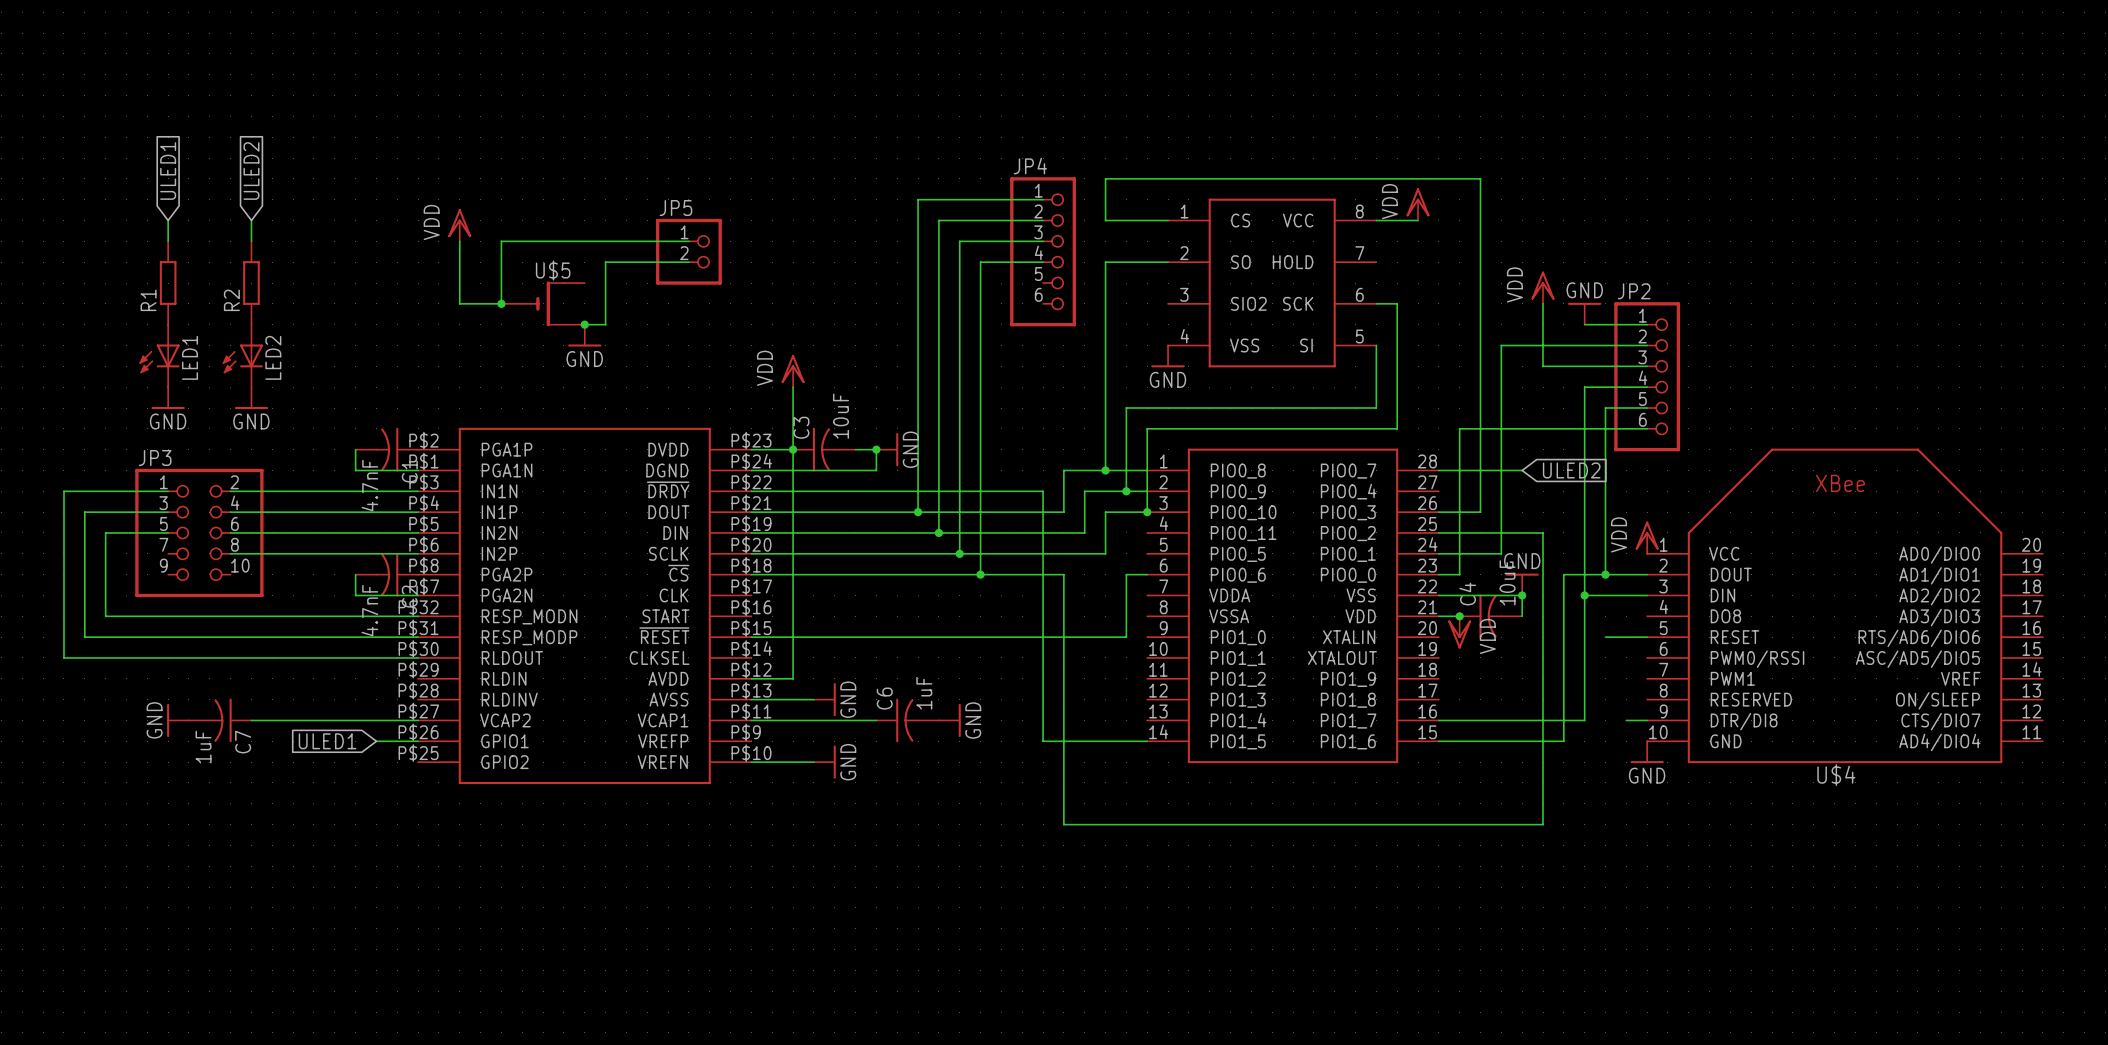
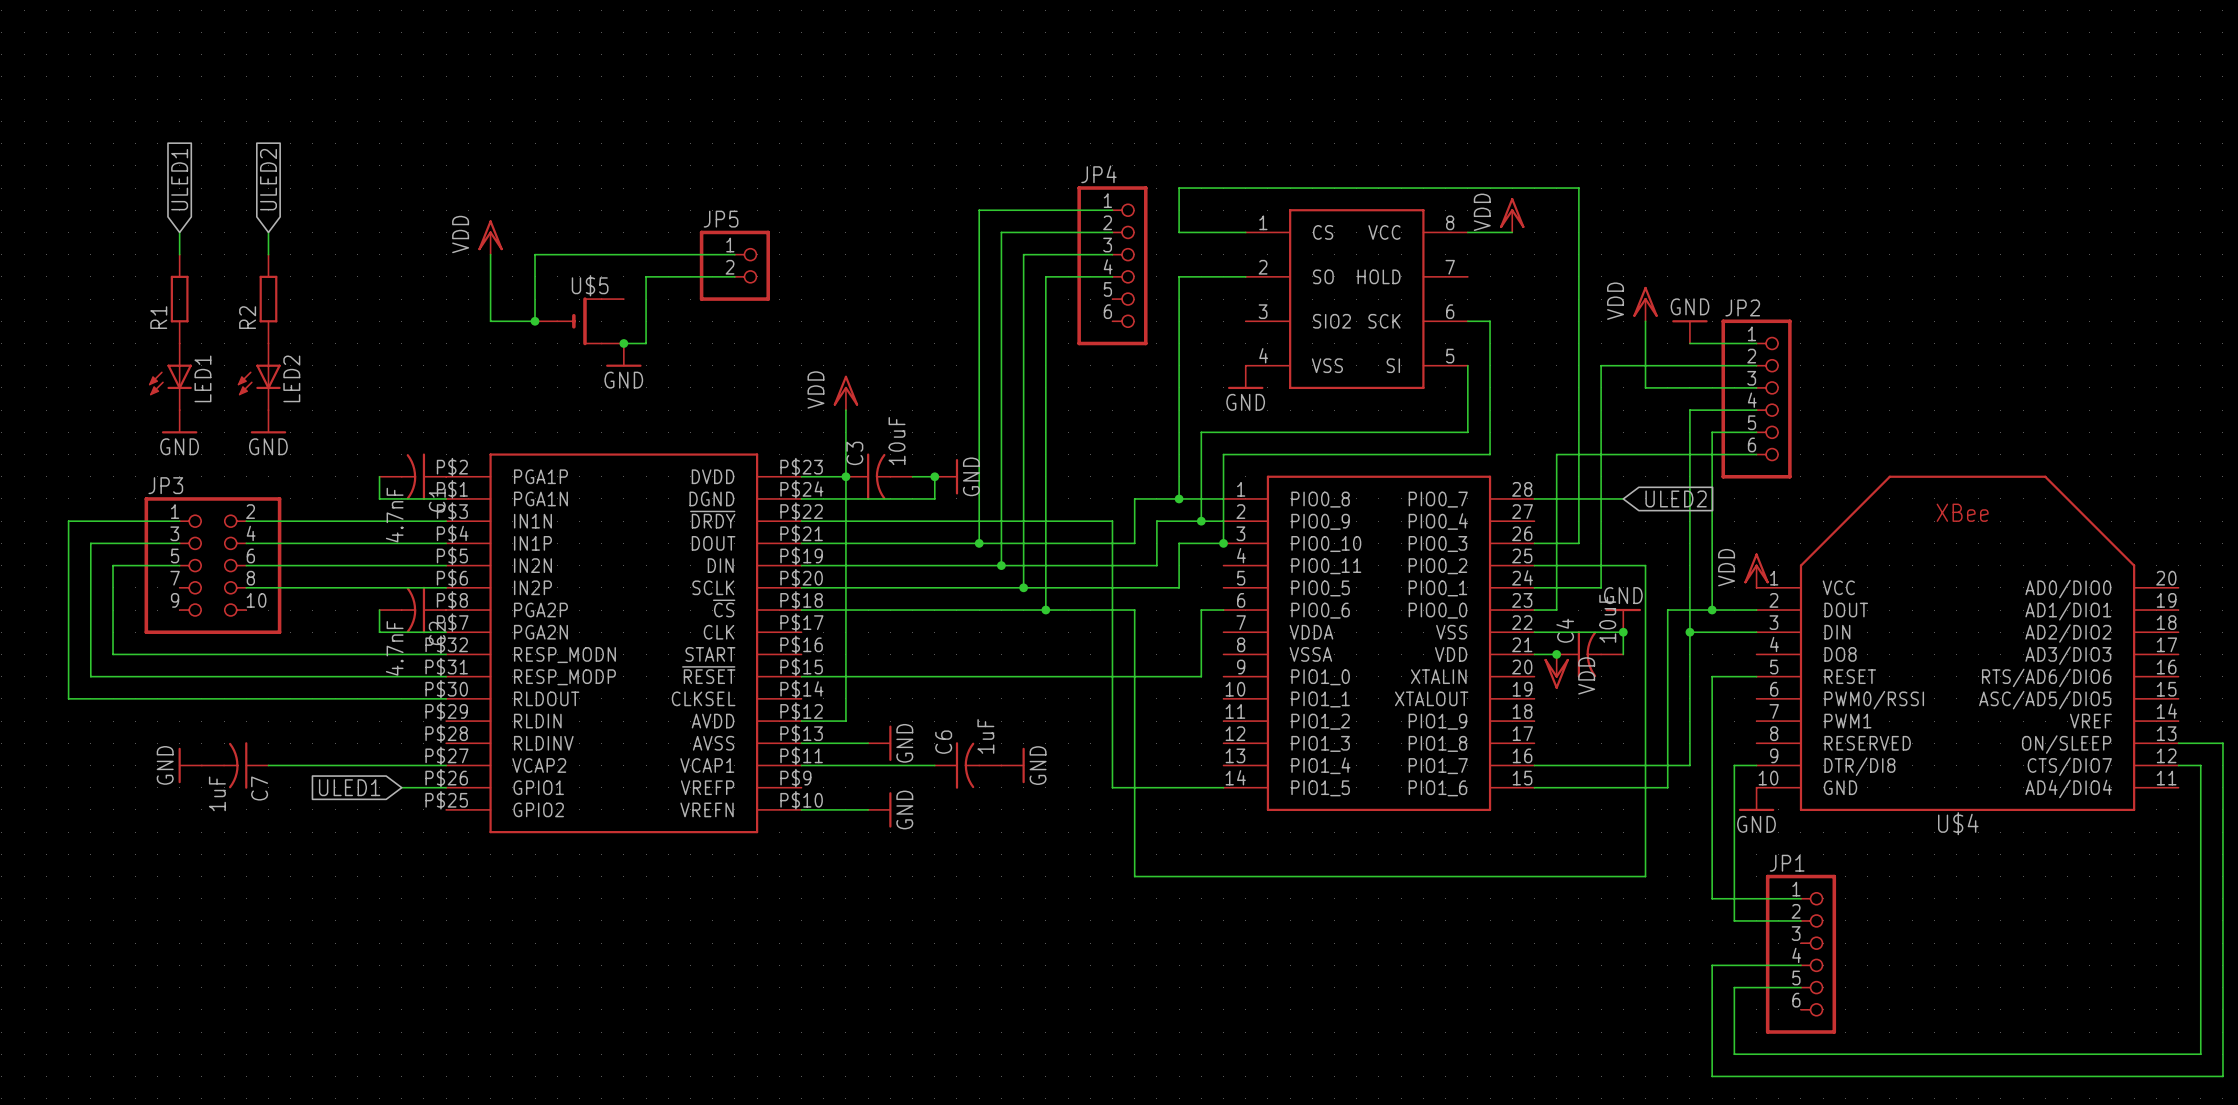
wire: none -> (1712, 676) (1712, 898) (1800, 898)
wire: none -> (2178, 743) (2222, 743) (2222, 1076) (1712, 1076) (1712, 965) (1800, 965)
wire: none -> (1734, 765) (1734, 920) (1800, 920)
wire: none -> (2178, 765) (2200, 765) (2200, 1054) (1734, 1054) (1734, 987) (1800, 987)
JP1: none -> (1800, 954)

